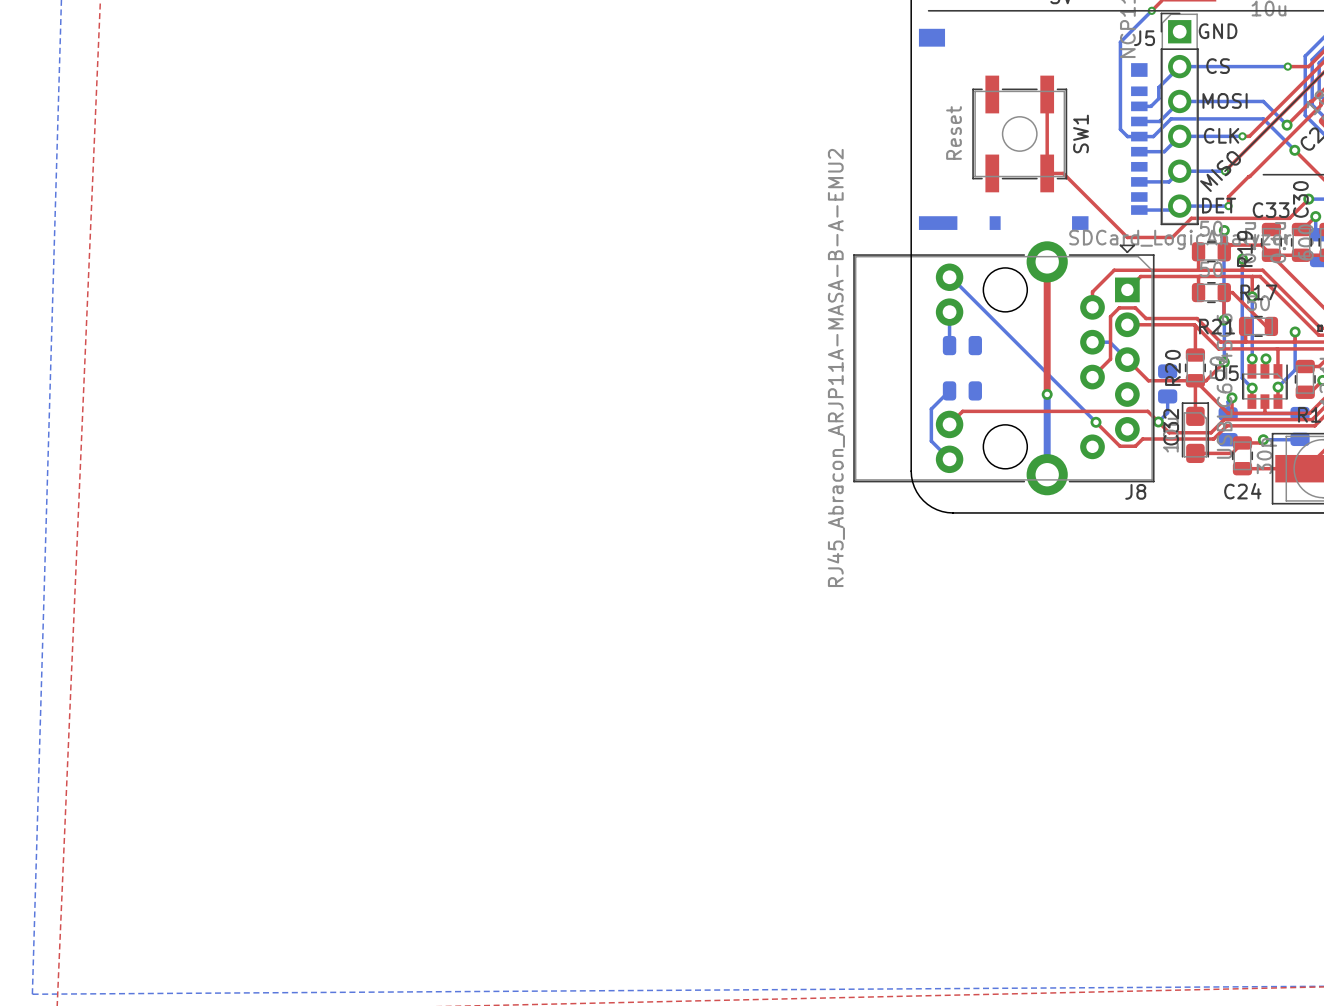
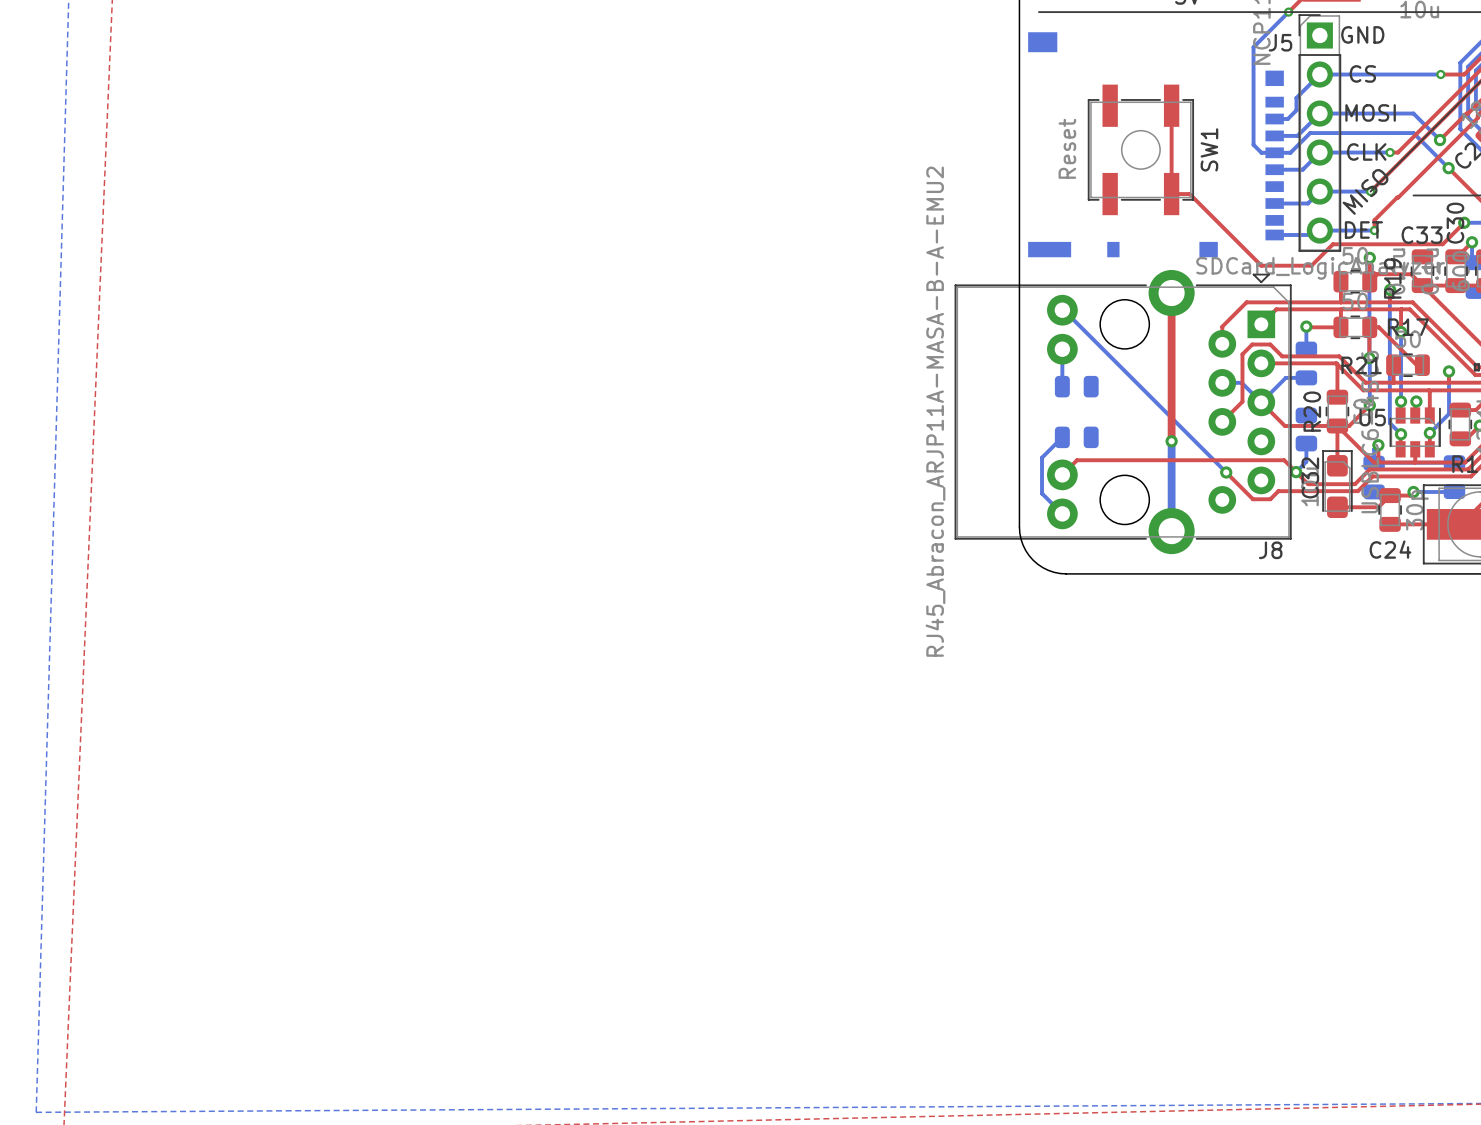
top track: none -> (1306, 326) (1340, 327)
bottom track: none -> (1306, 326) (1306, 349)
via: none -> (1306, 326)
part: none -> (1306, 363)
bottom track: none -> (1306, 377) (1285, 377) (1261, 402)

